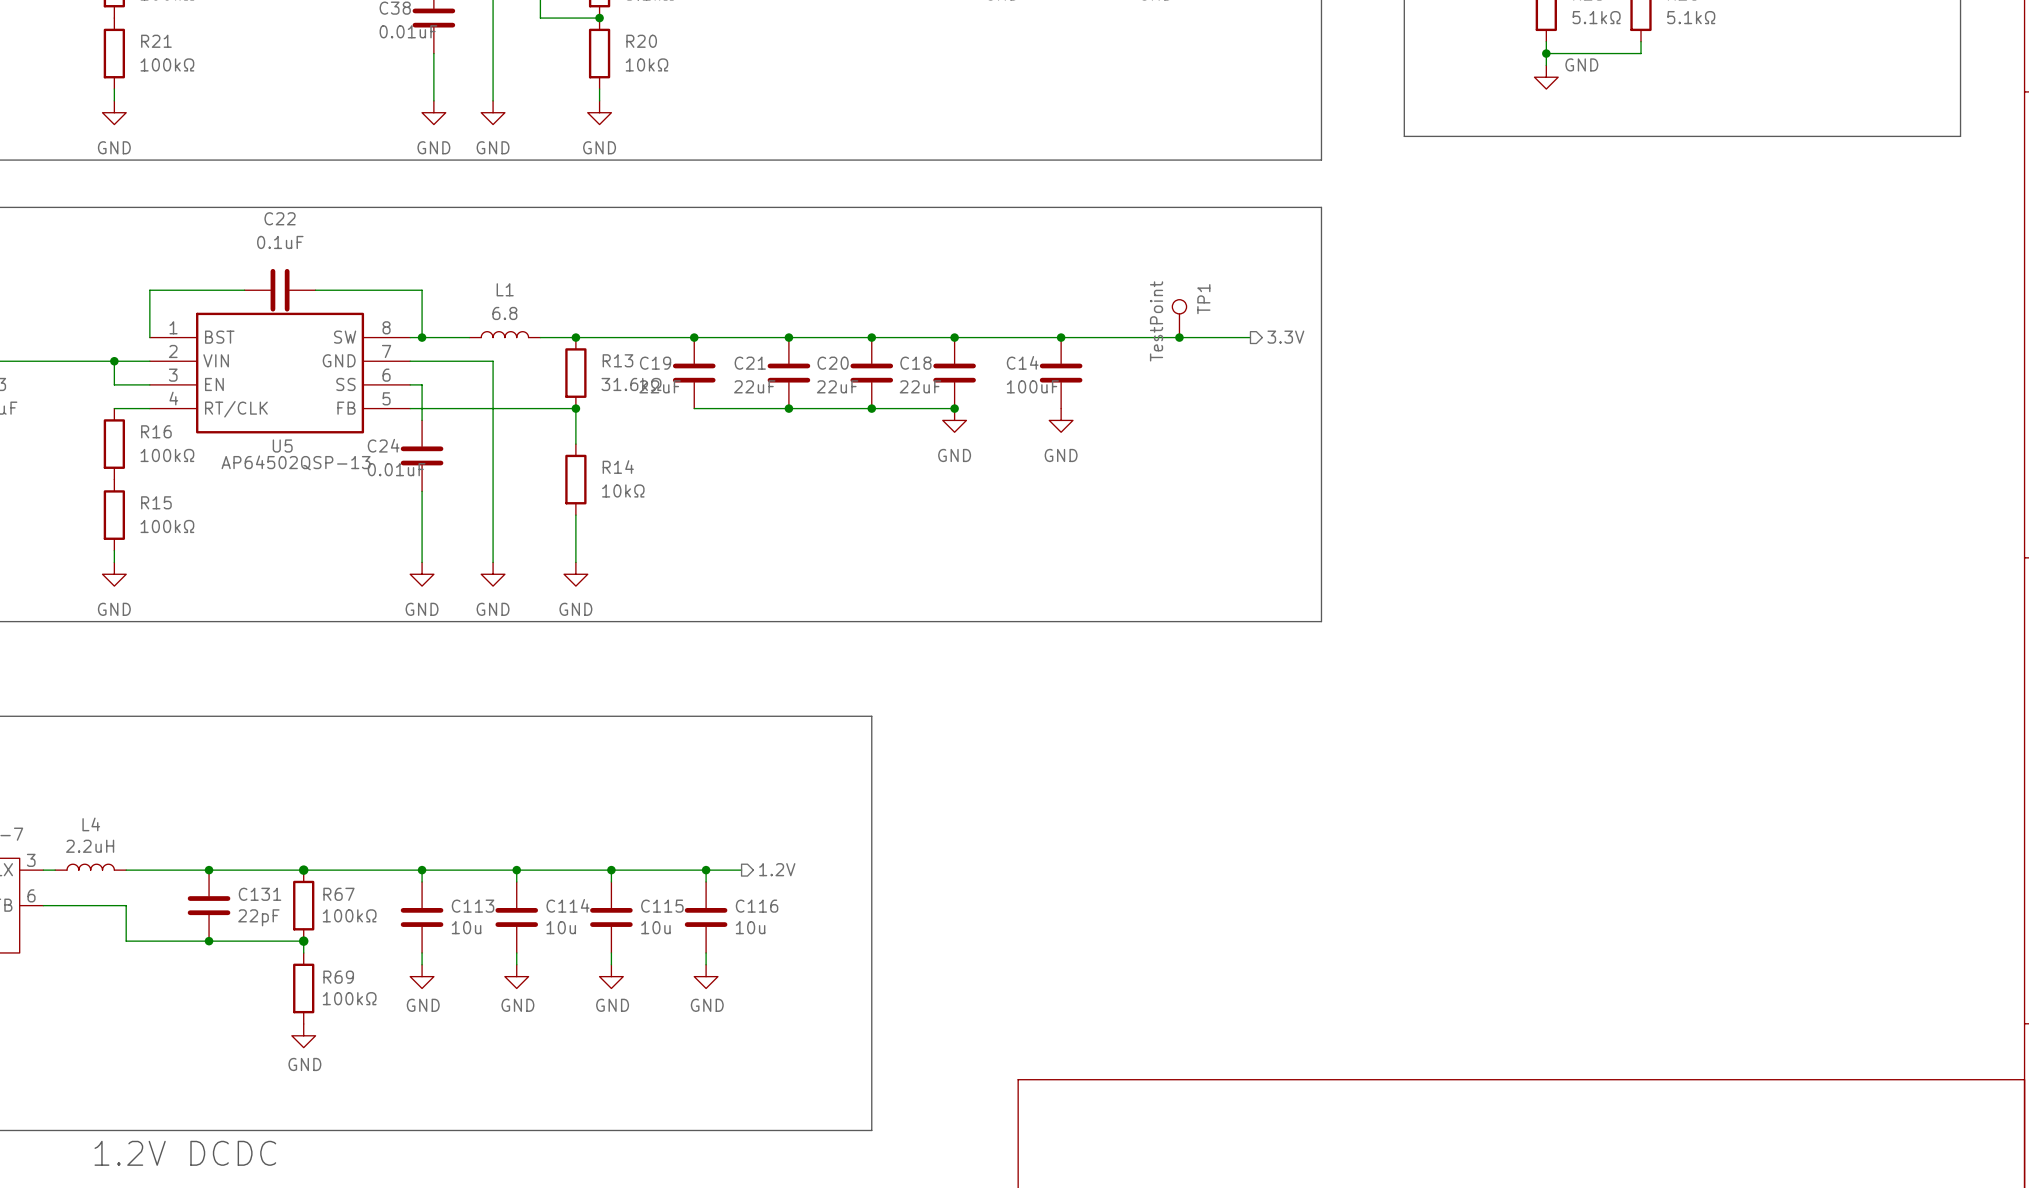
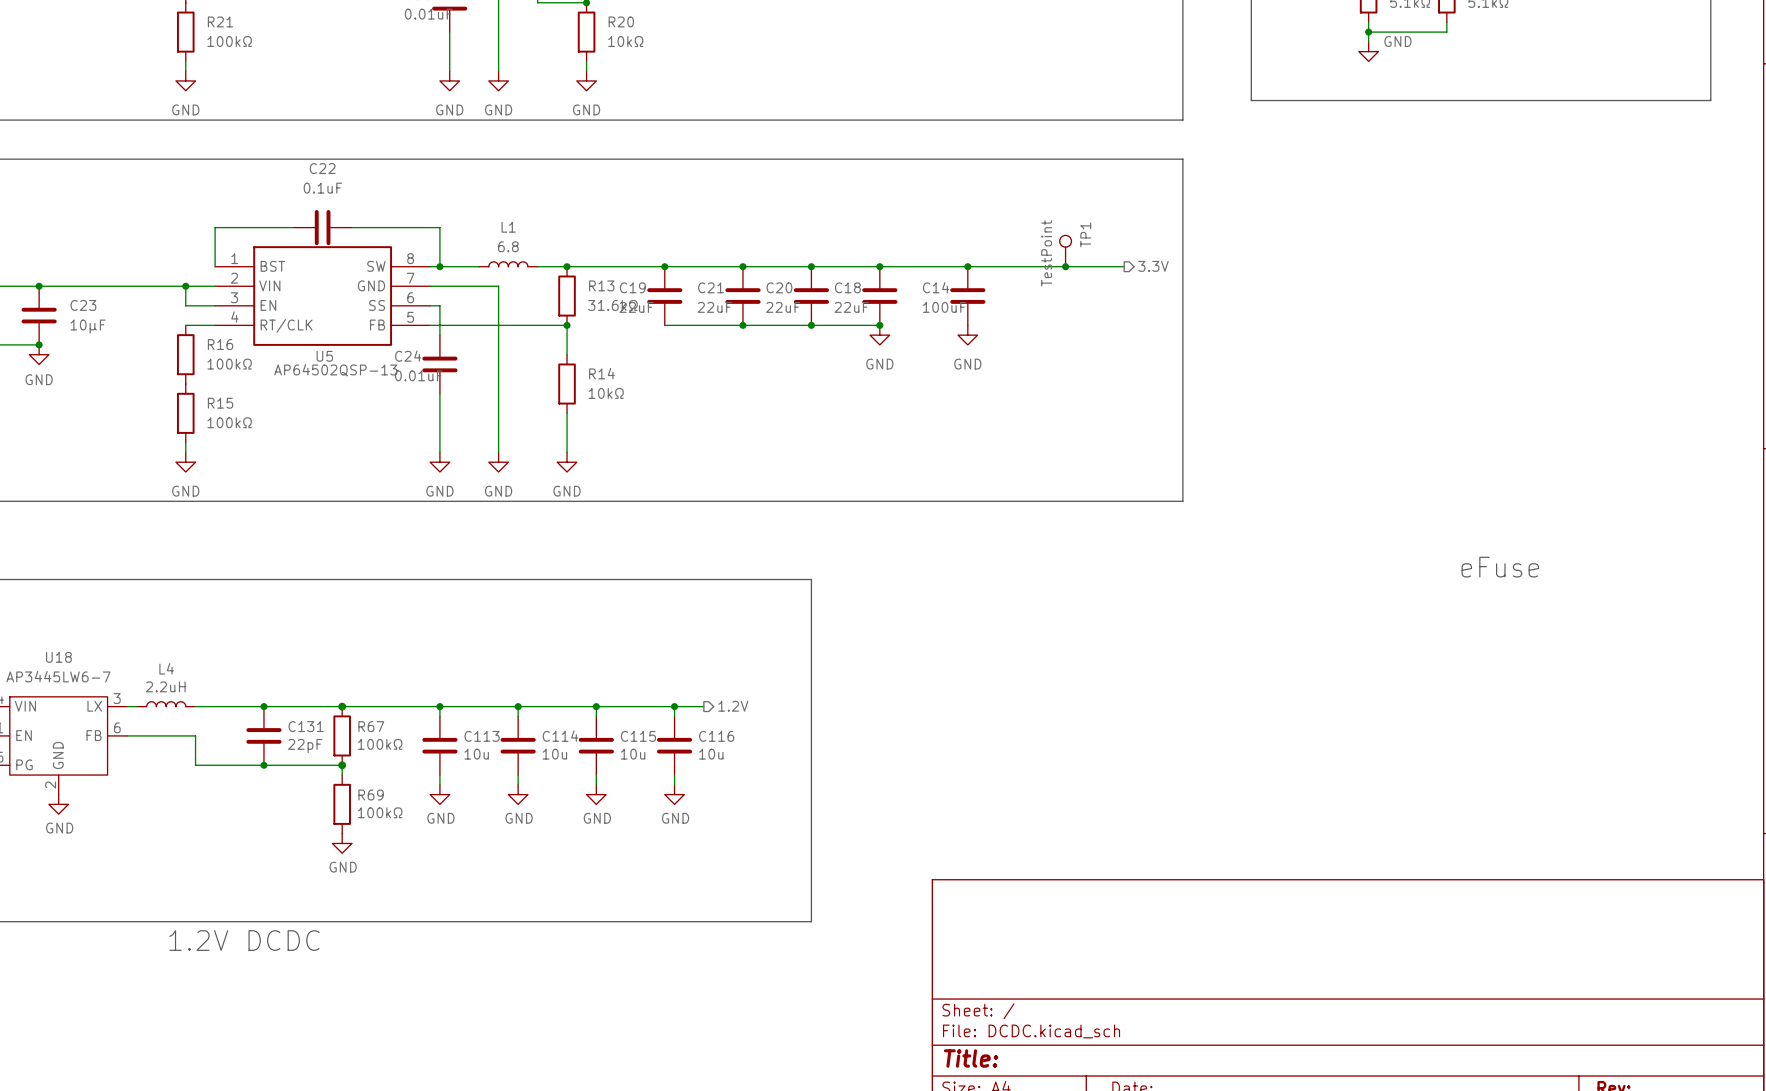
text: none -> eFuse (1500, 567)

